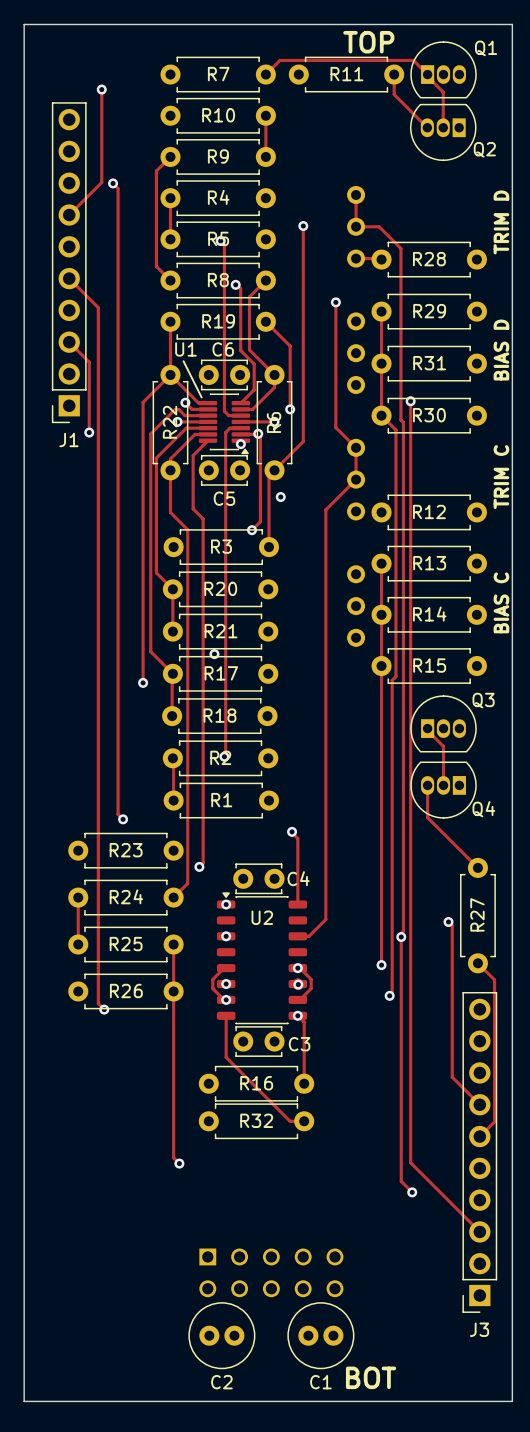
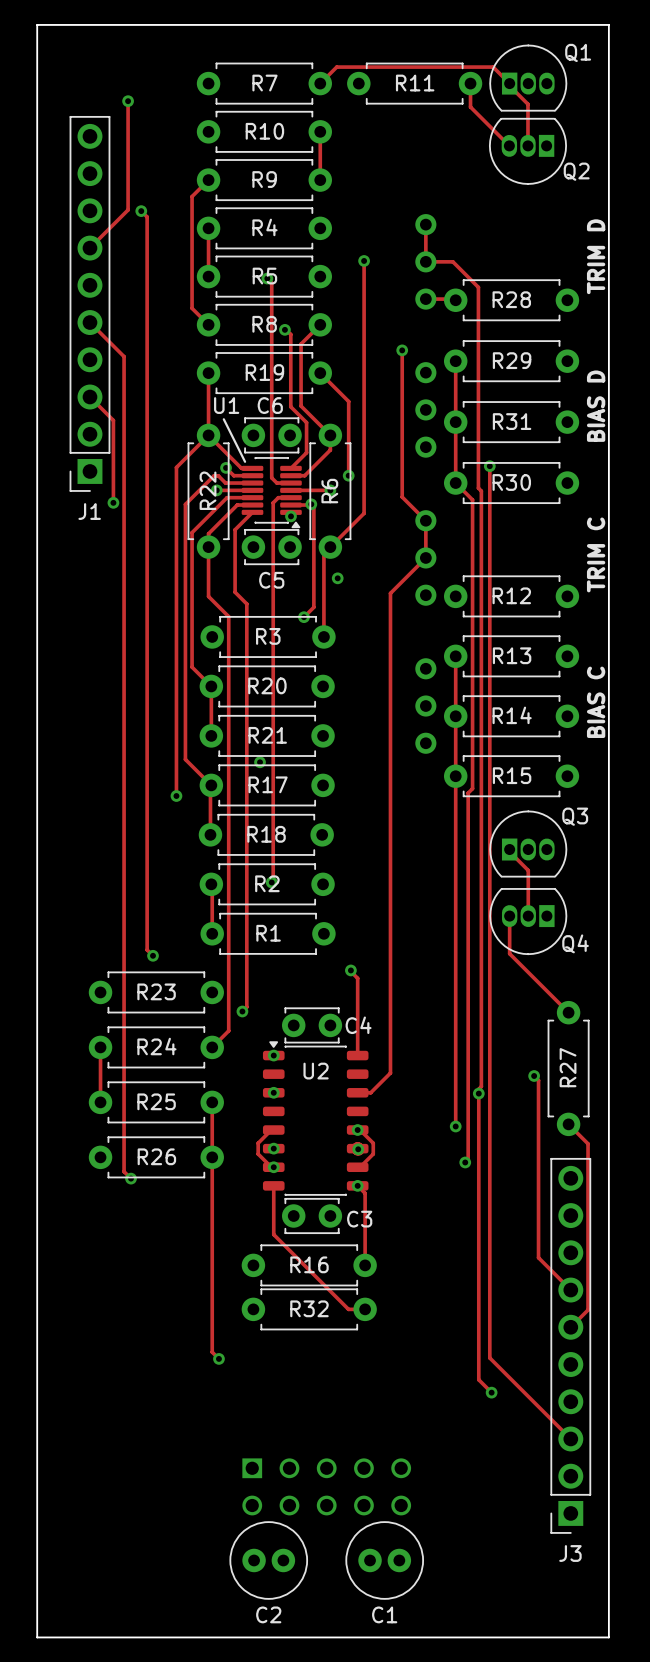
text: TOP (368, 42) -> none
text: BOT (371, 1377) -> none

